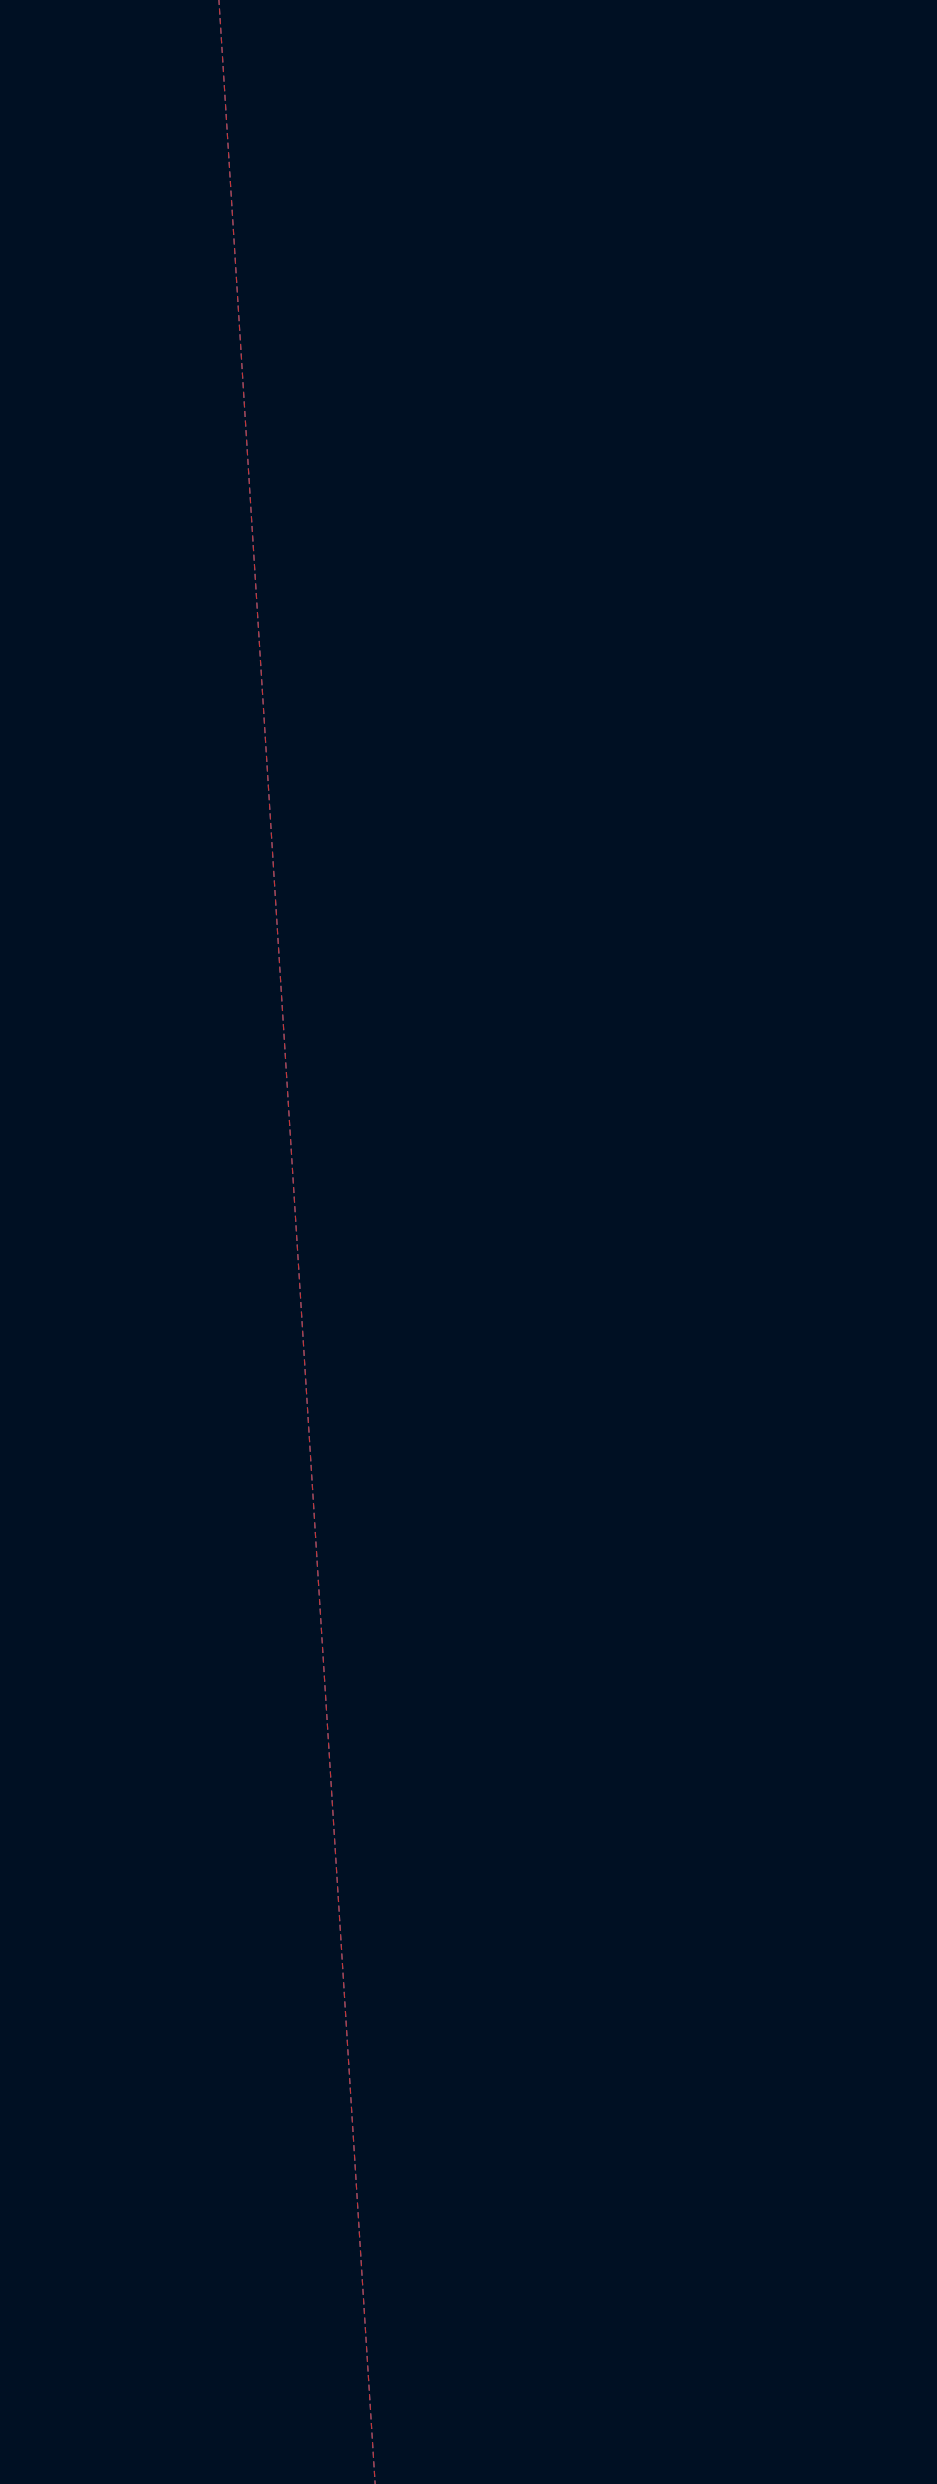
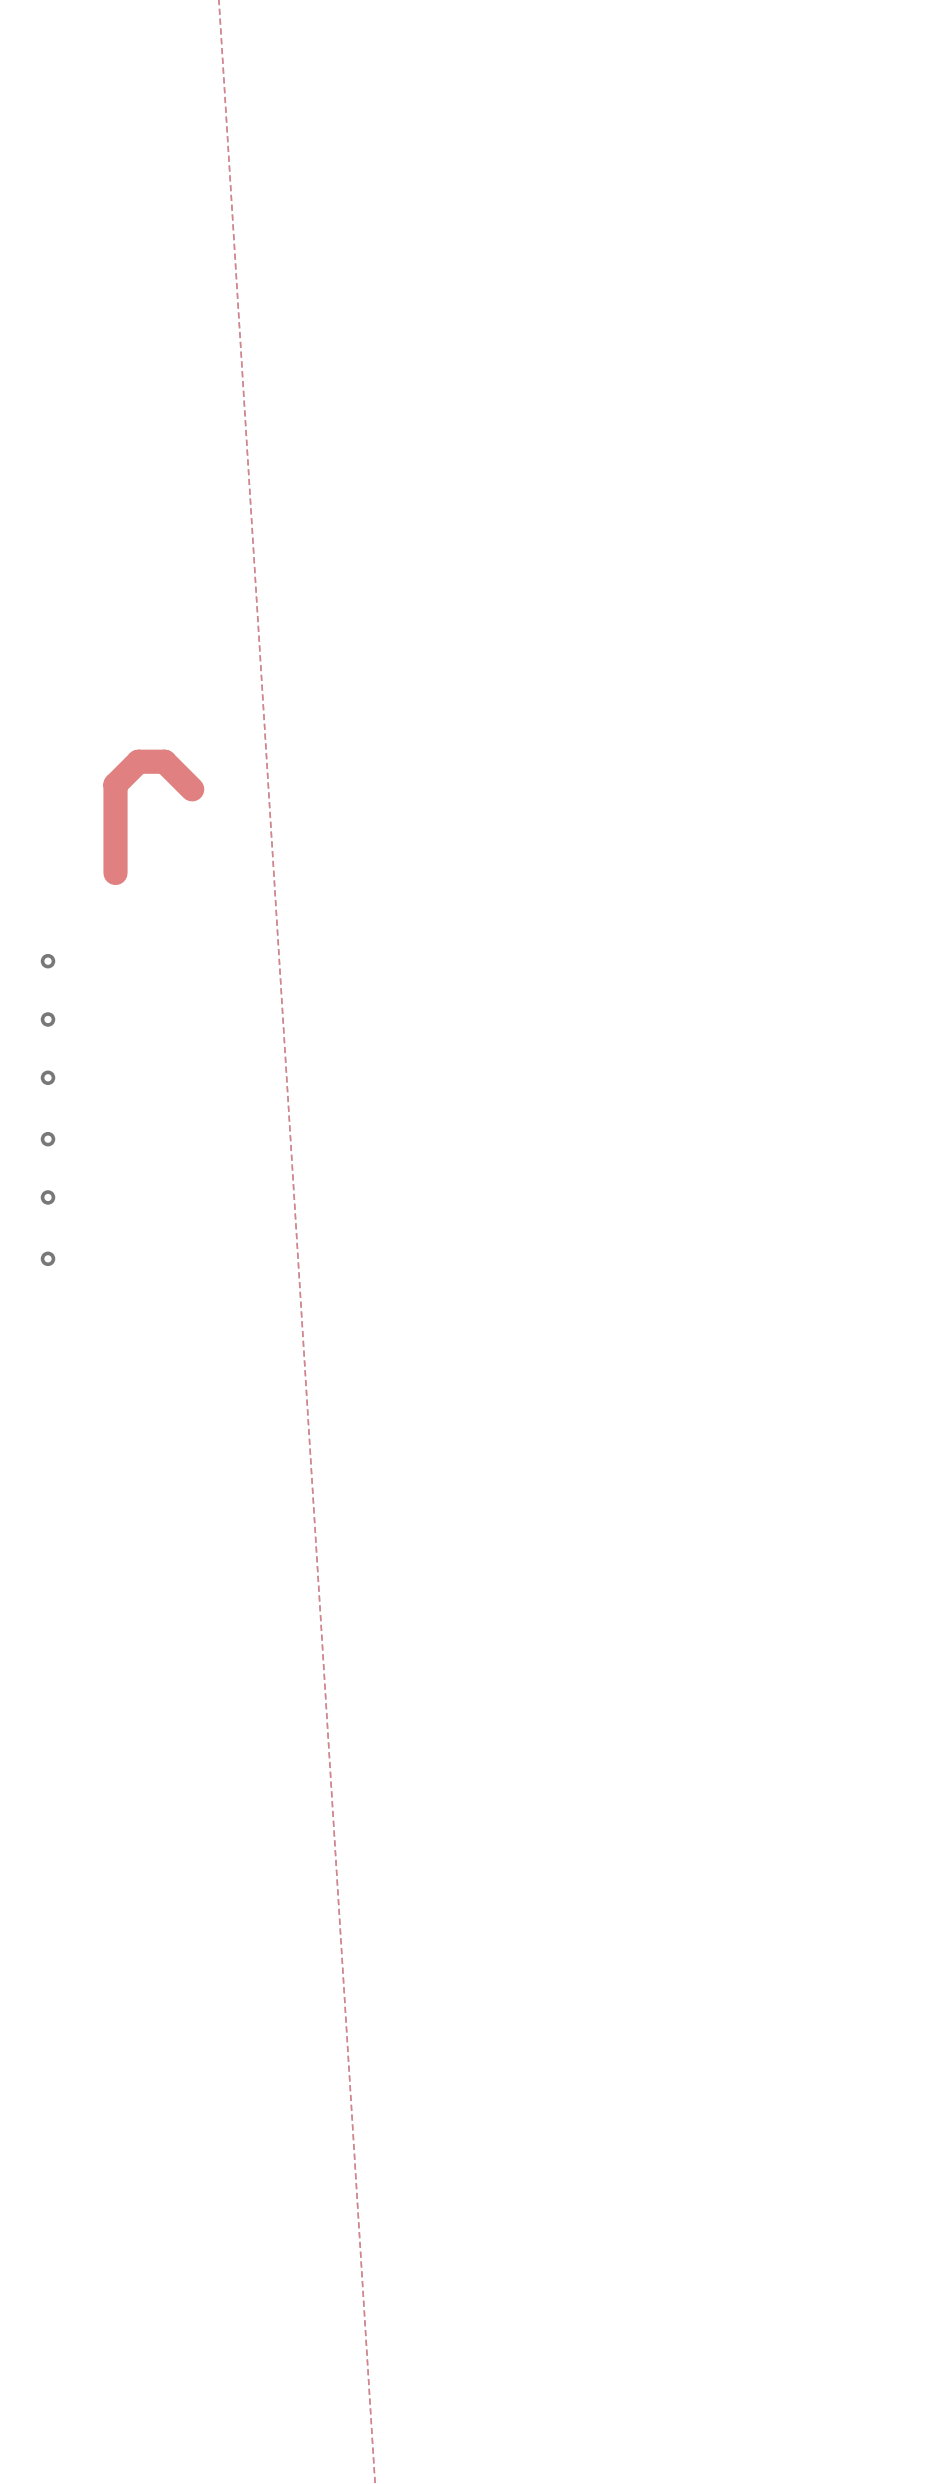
top track: none -> (192, 789) (164, 761) (138, 761) (115, 784) (115, 872)
via: none -> (48, 961)
via: none -> (48, 1019)
via: none -> (48, 1077)
via: none -> (48, 1139)
via: none -> (48, 1197)
via: none -> (48, 1258)

